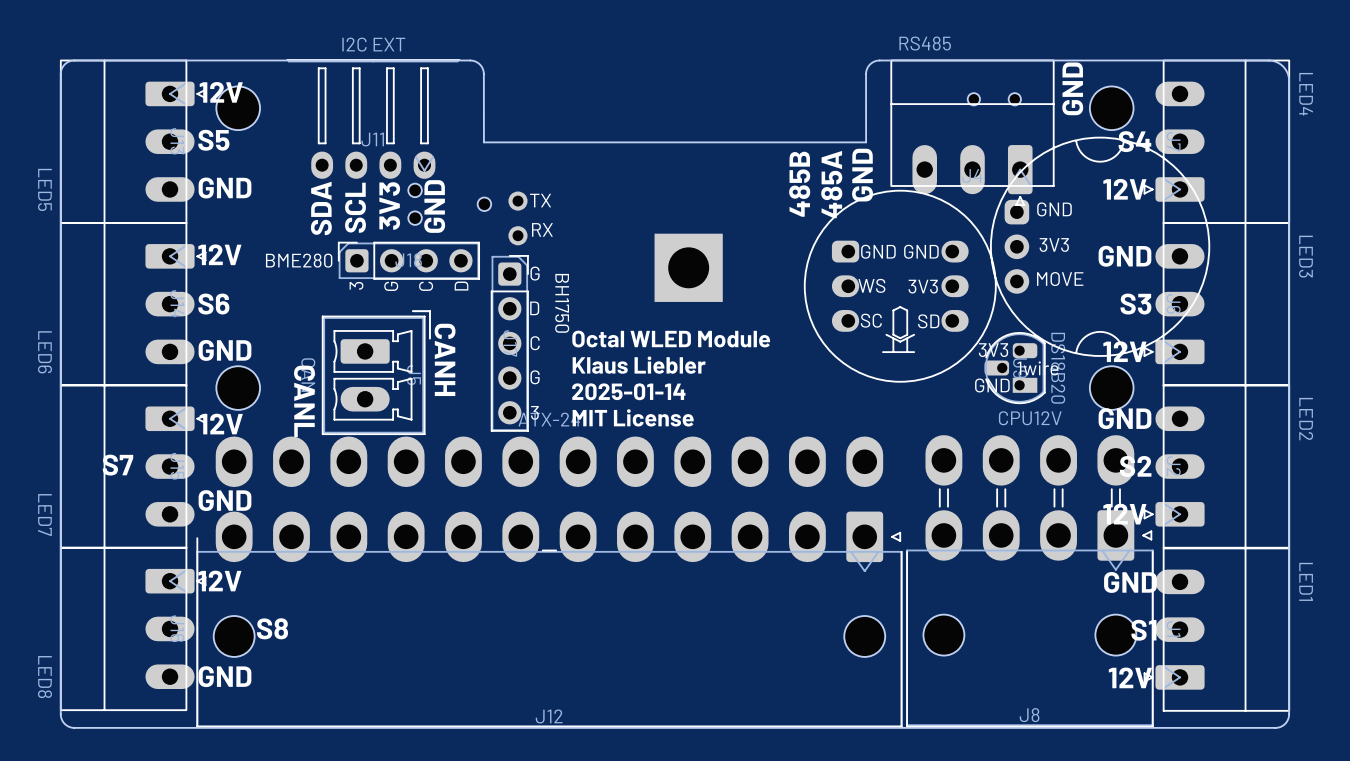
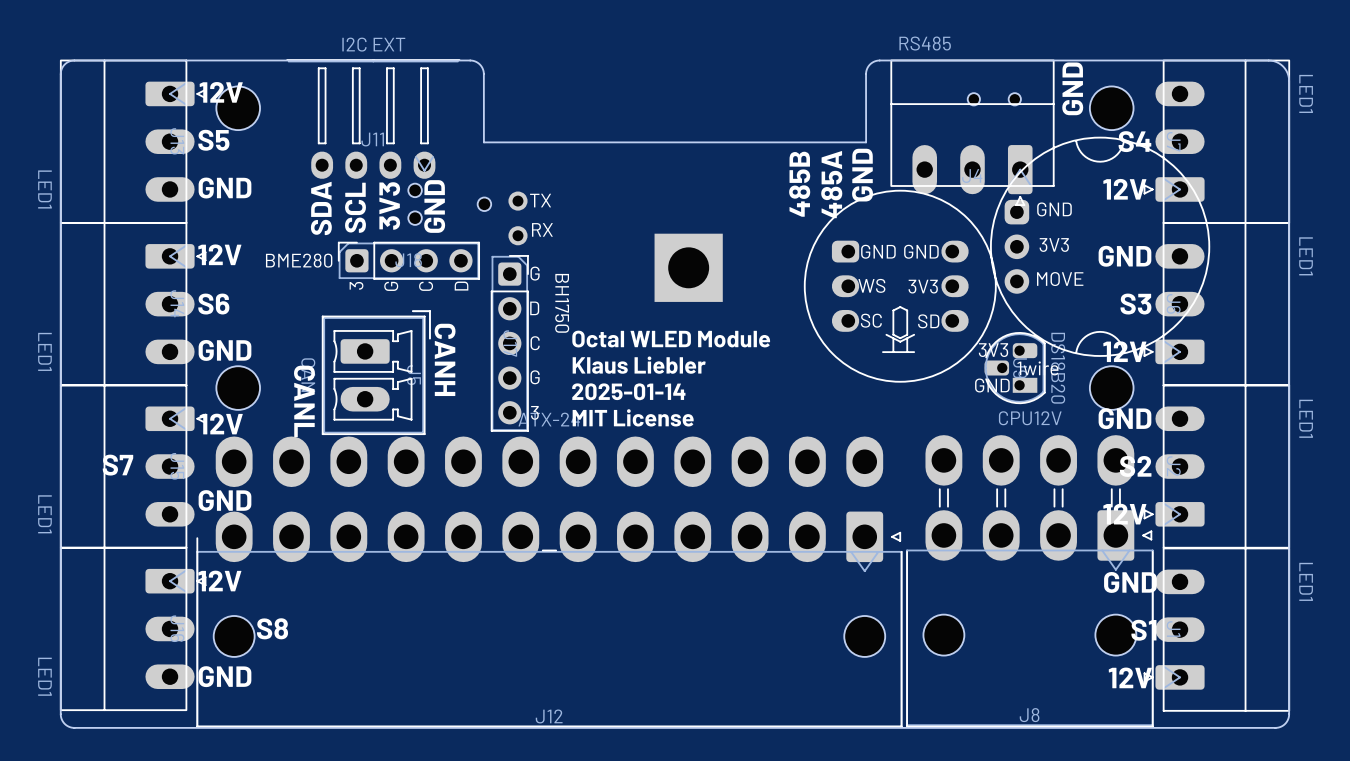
part value: LED4 (1306, 94) -> LED1 (1306, 93)
part value: LED5 (44, 189) -> LED1 (44, 189)
part value: LED3 (1305, 256) -> LED1 (1306, 256)
part value: LED6 (44, 352) -> LED1 (44, 351)
part value: LED2 (1306, 419) -> LED1 (1306, 418)
part value: LED7 (44, 515) -> LED1 (44, 514)
part value: LED8 (44, 677) -> LED1 (44, 676)

